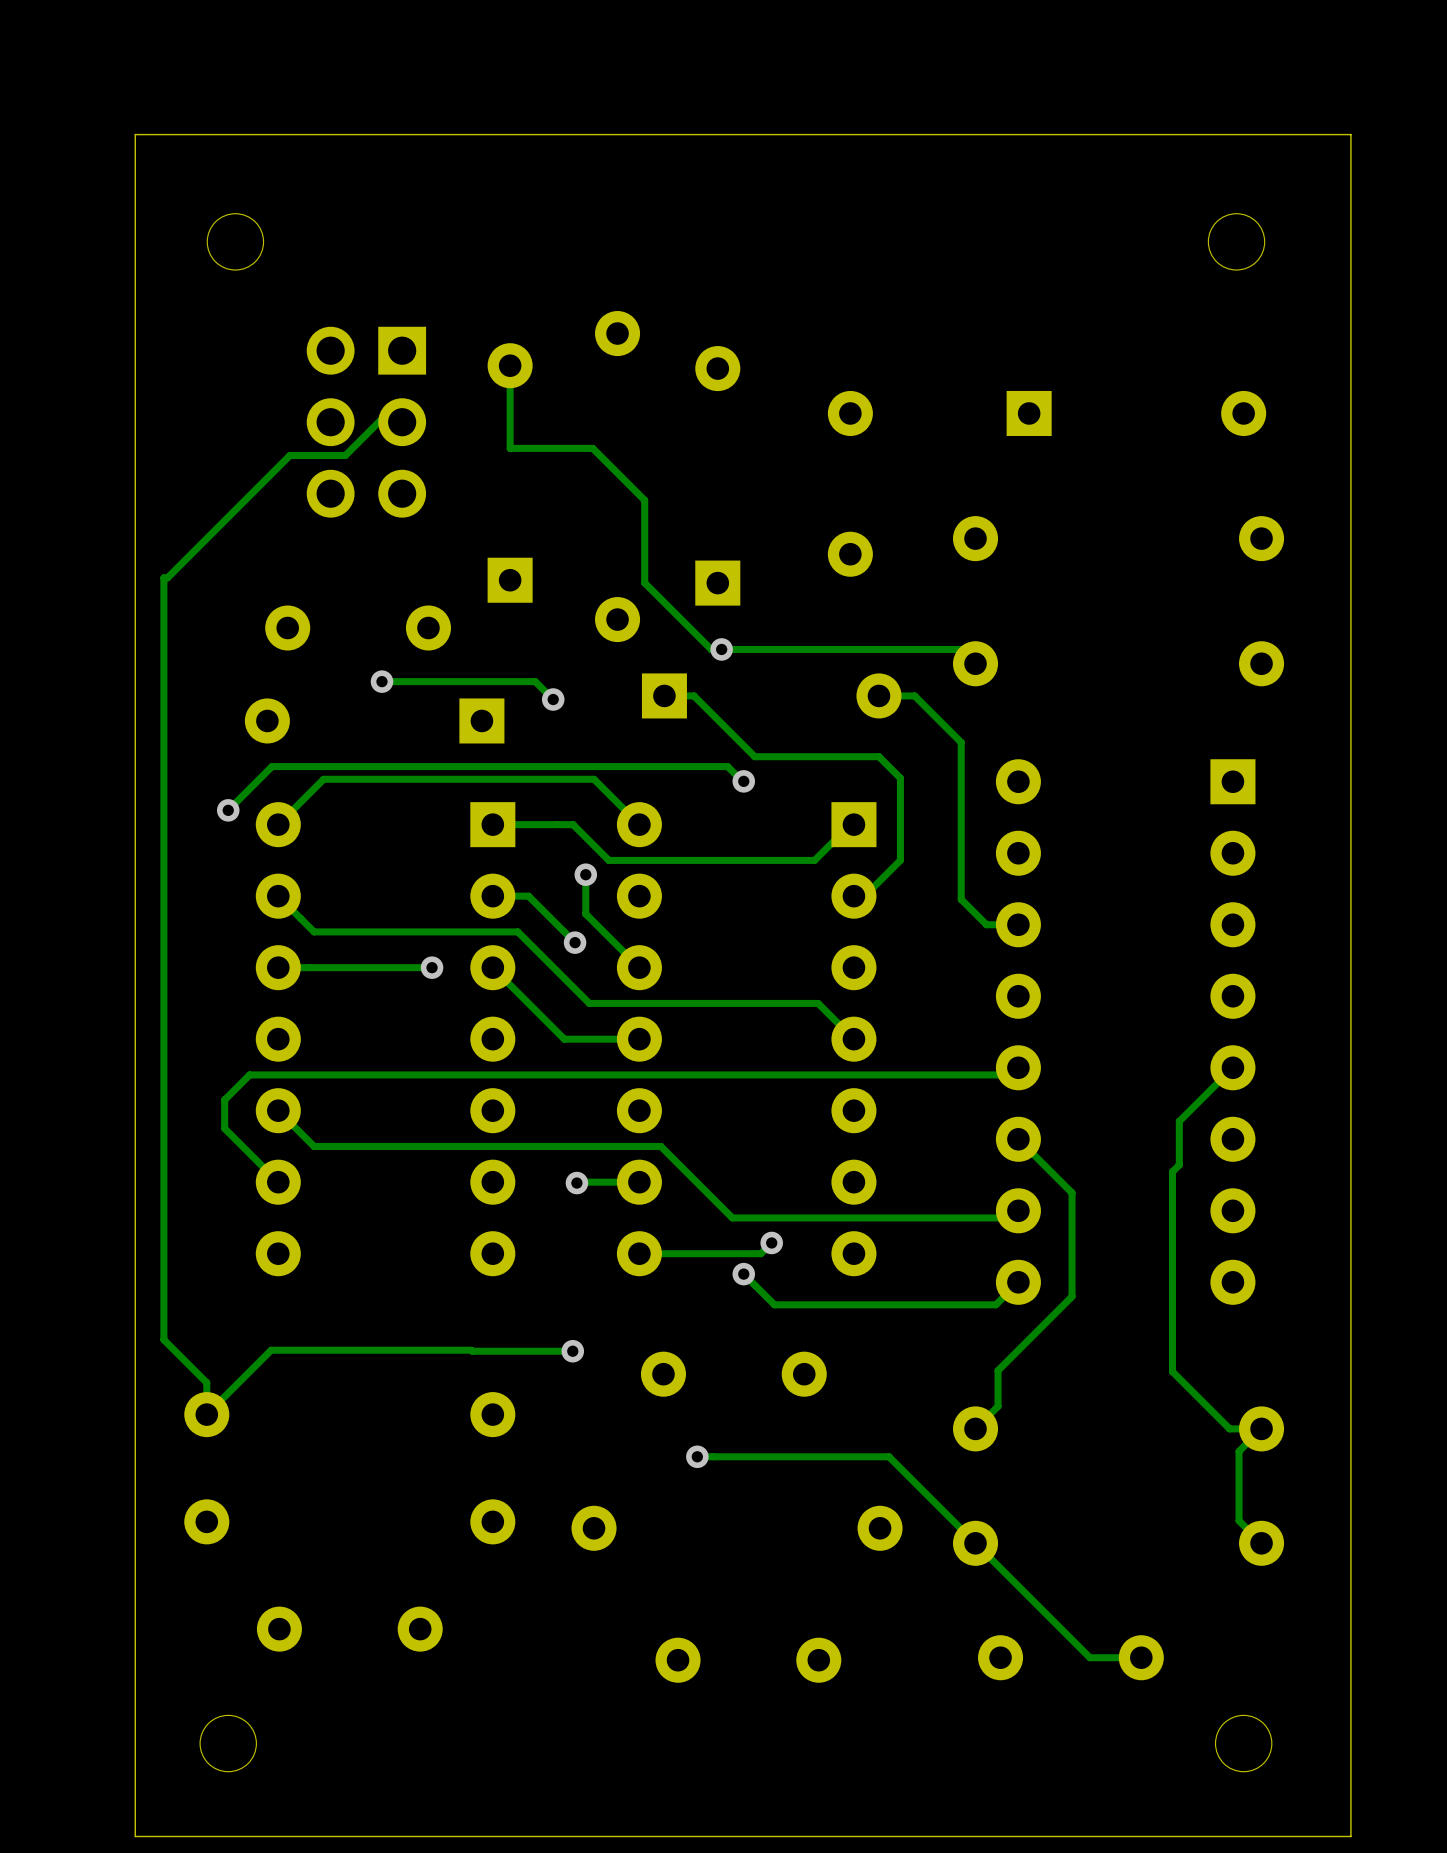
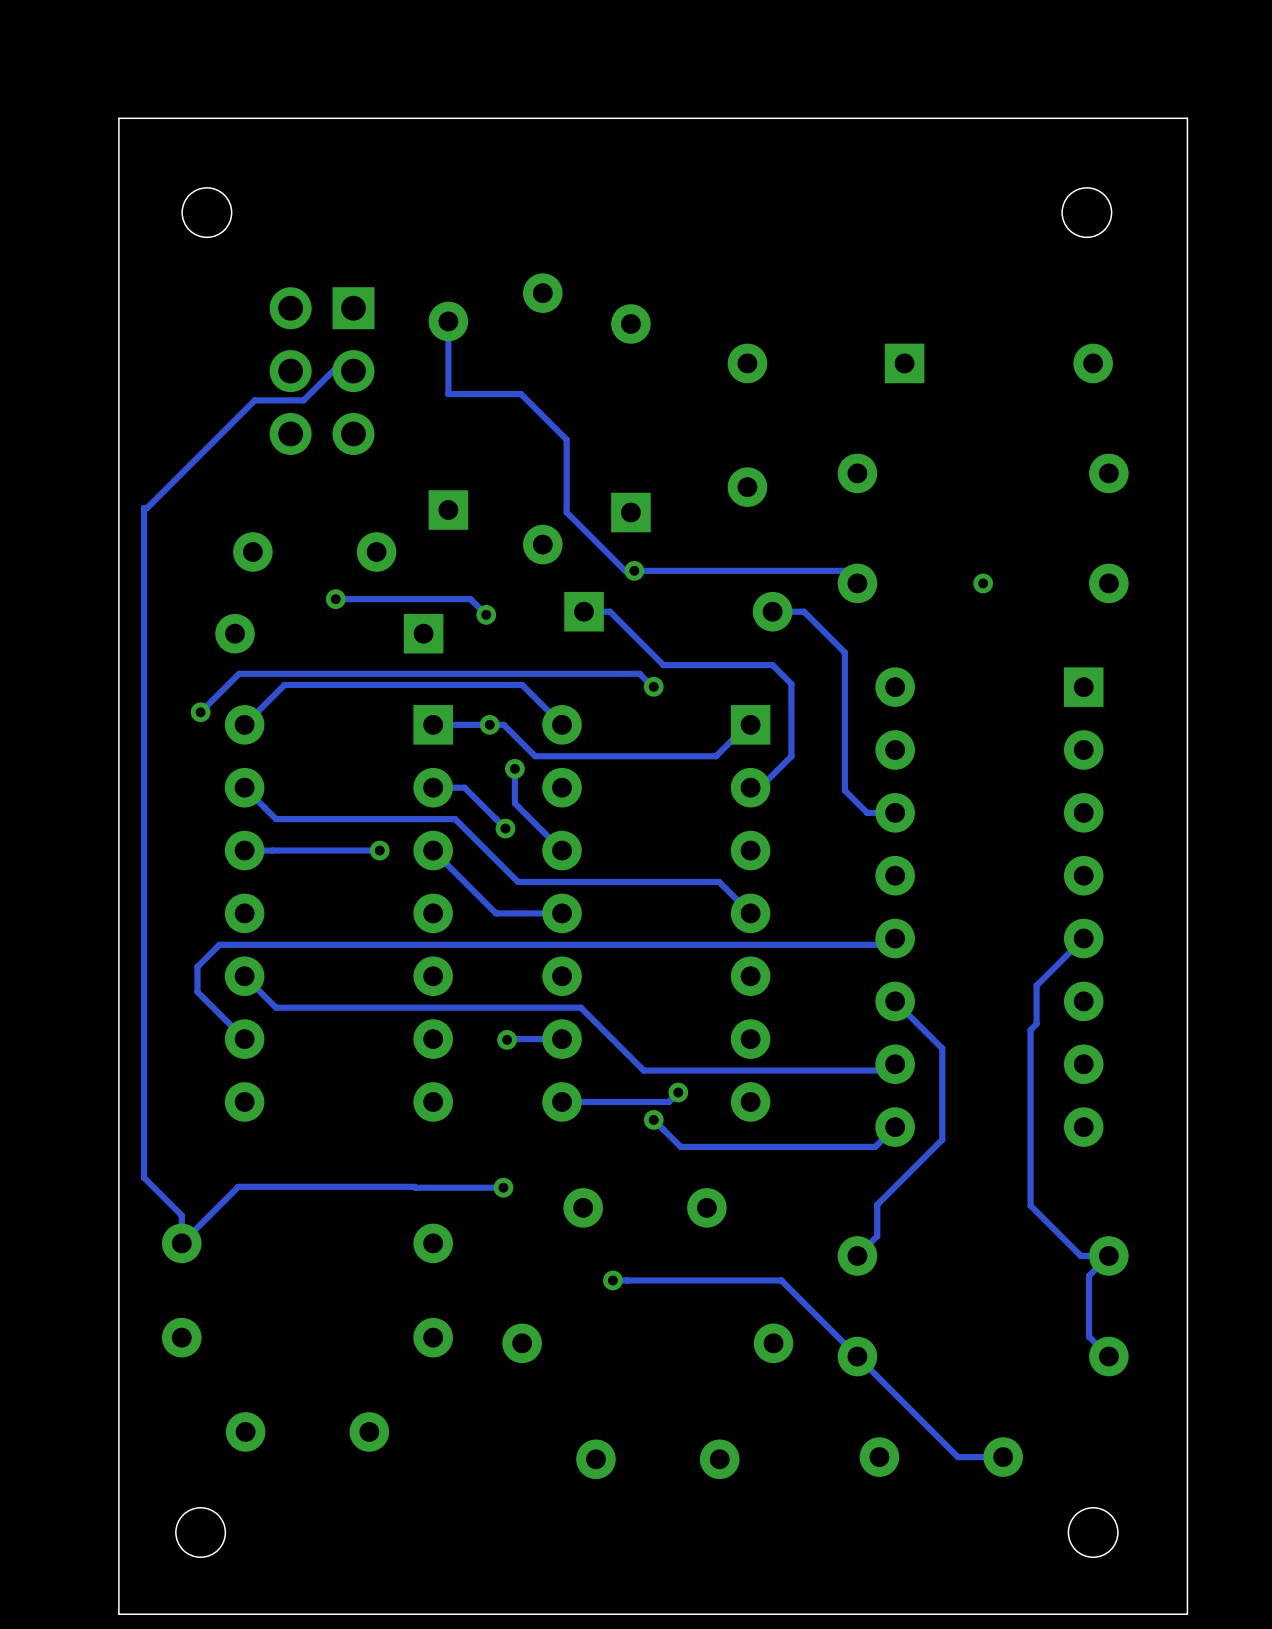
via: none -> (983, 583)
via: none -> (489, 724)

